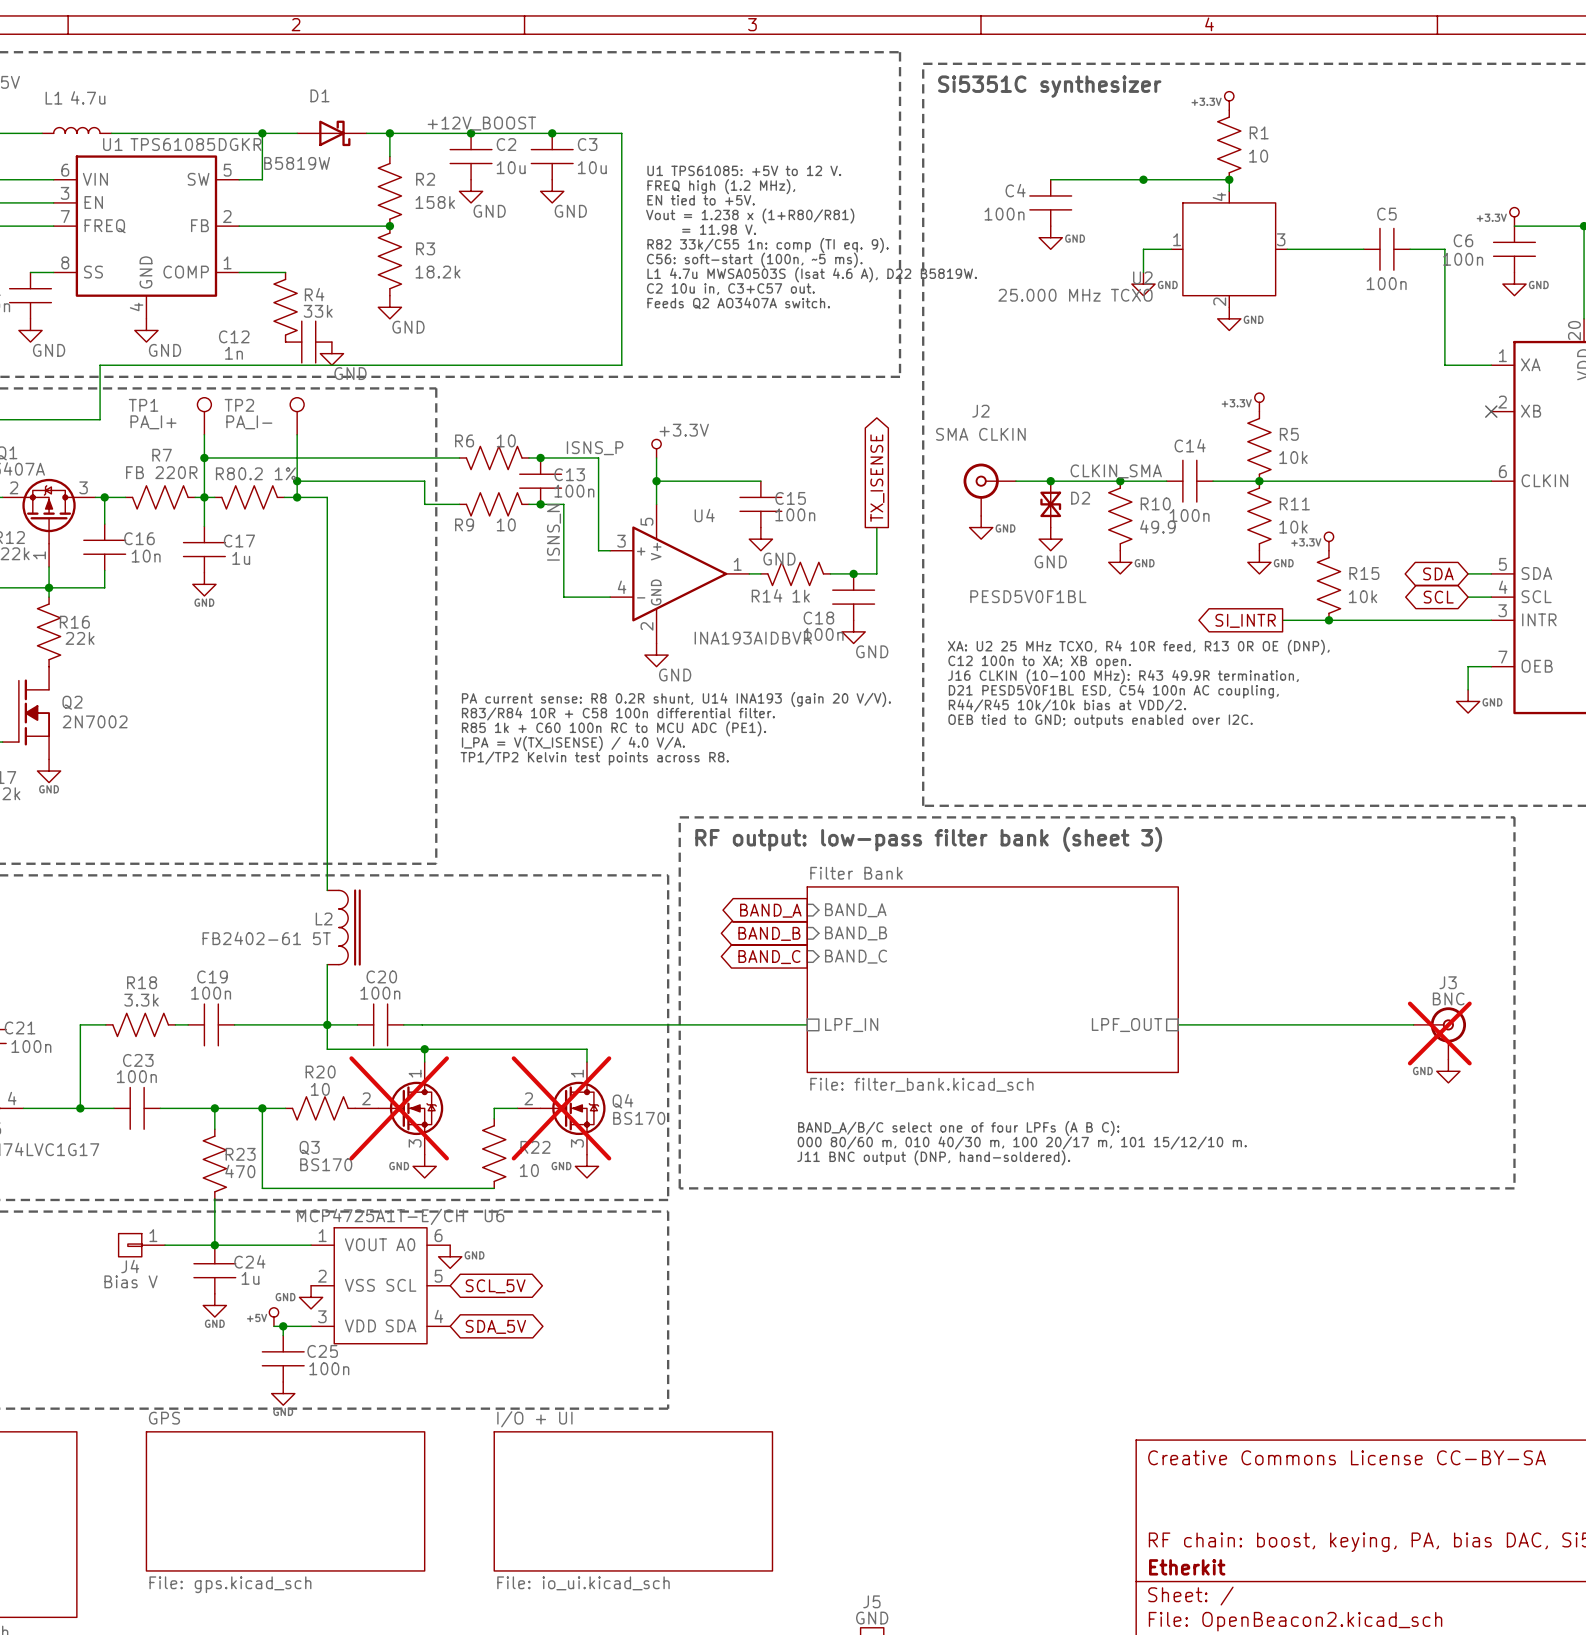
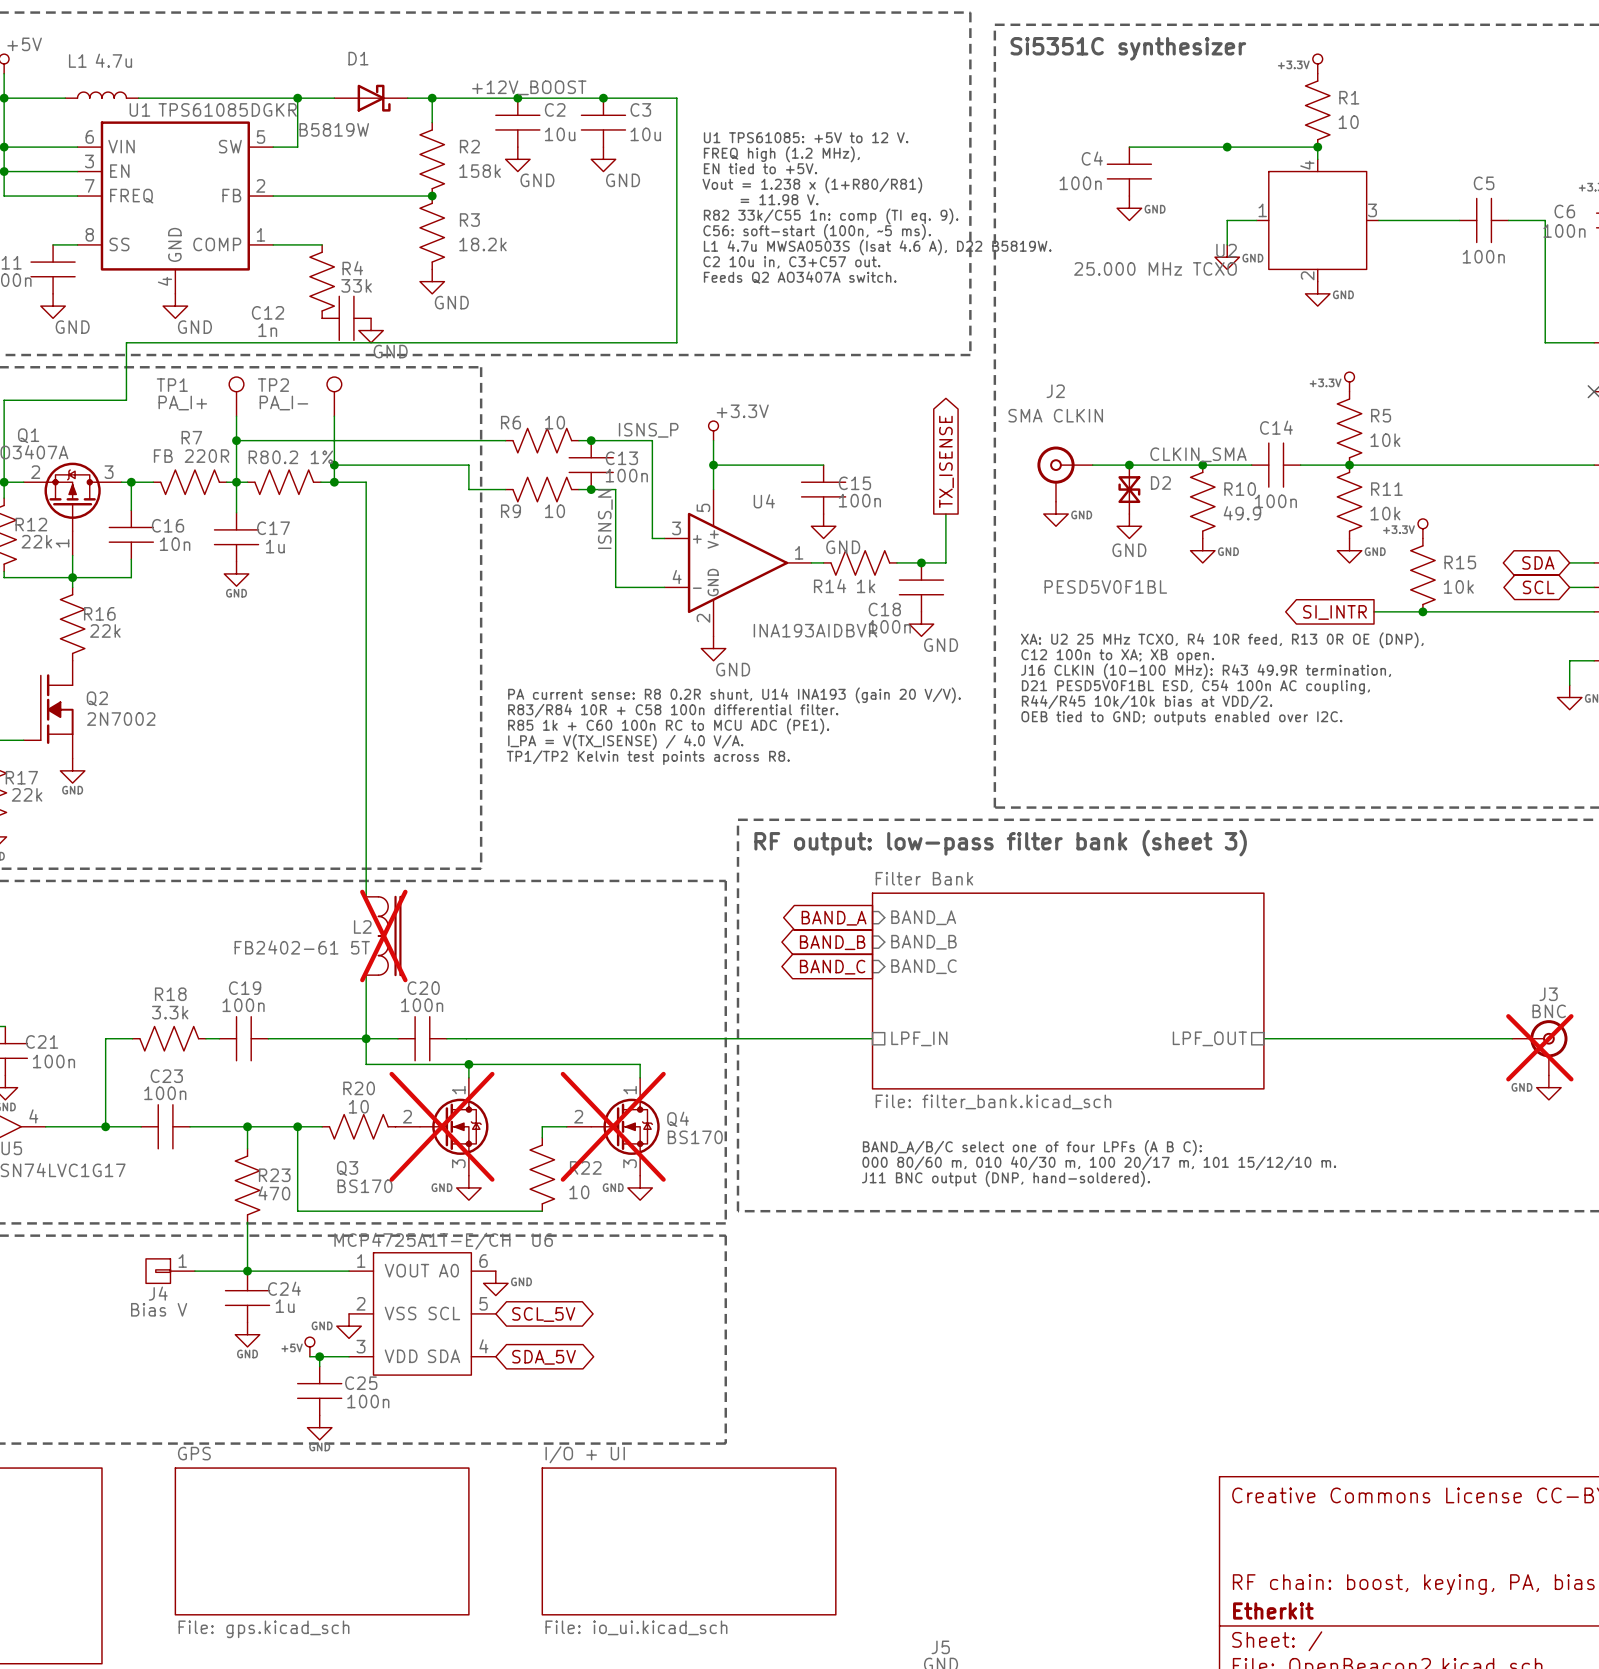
L2 do-not-place cross: none -> (383, 935)

